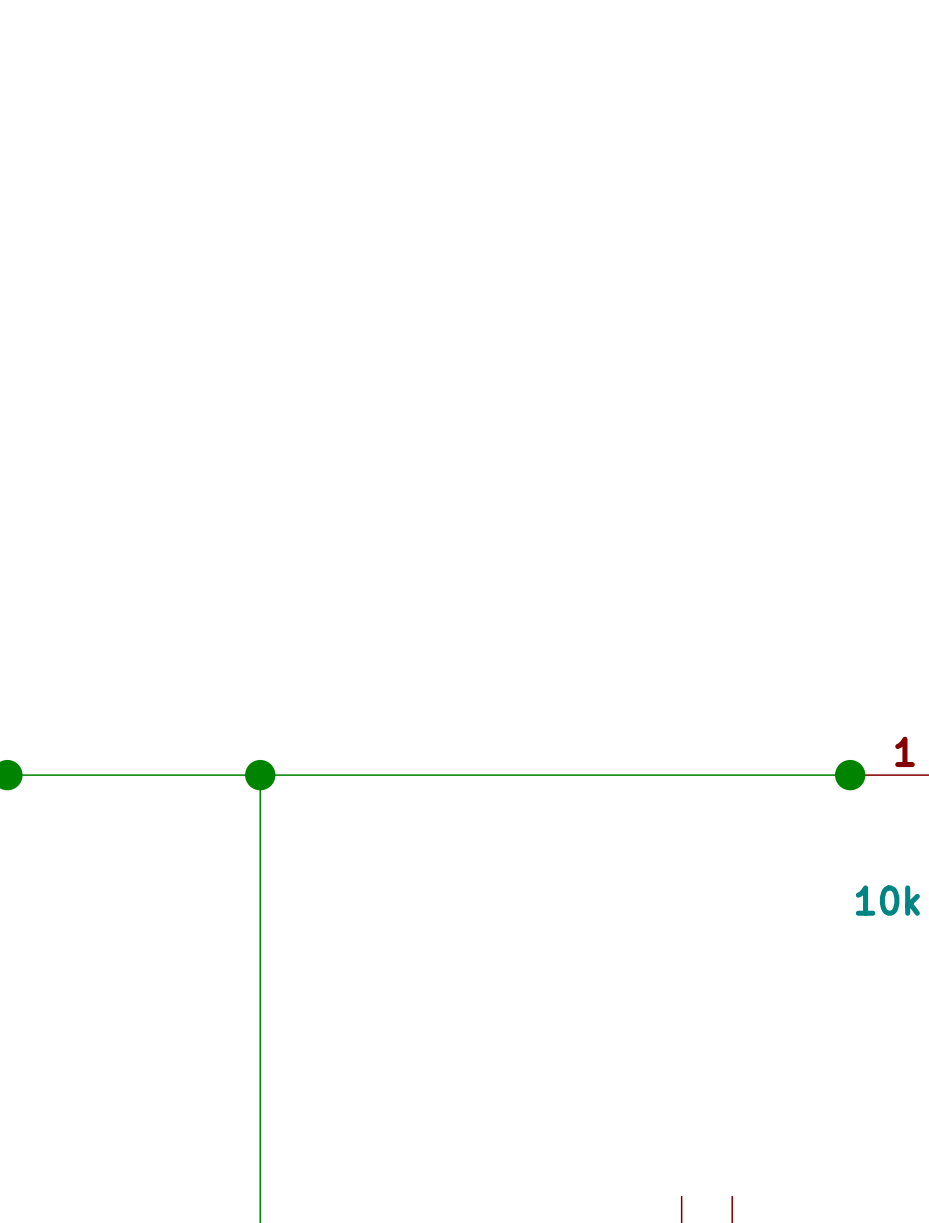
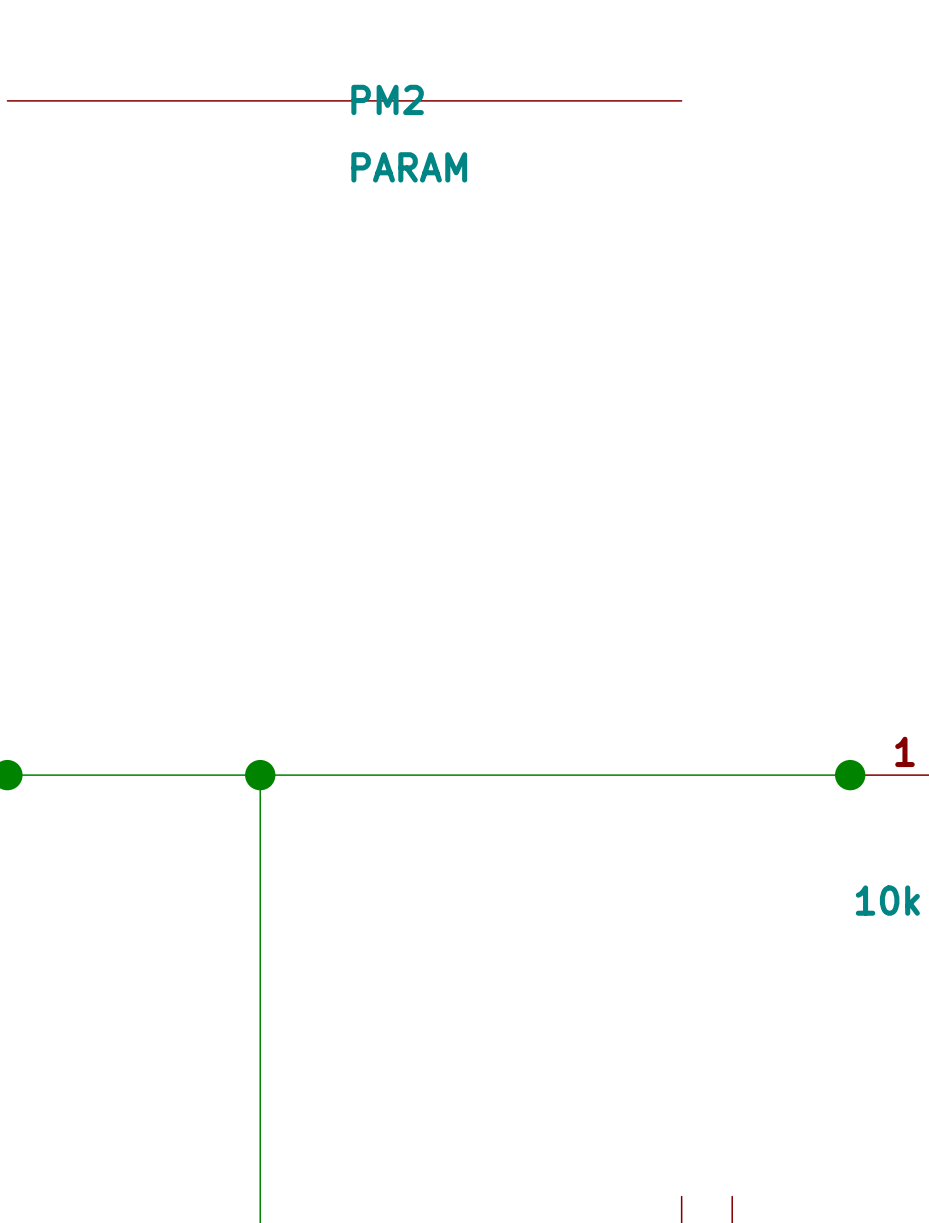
PM2: none -> PARAM (344, 100)

